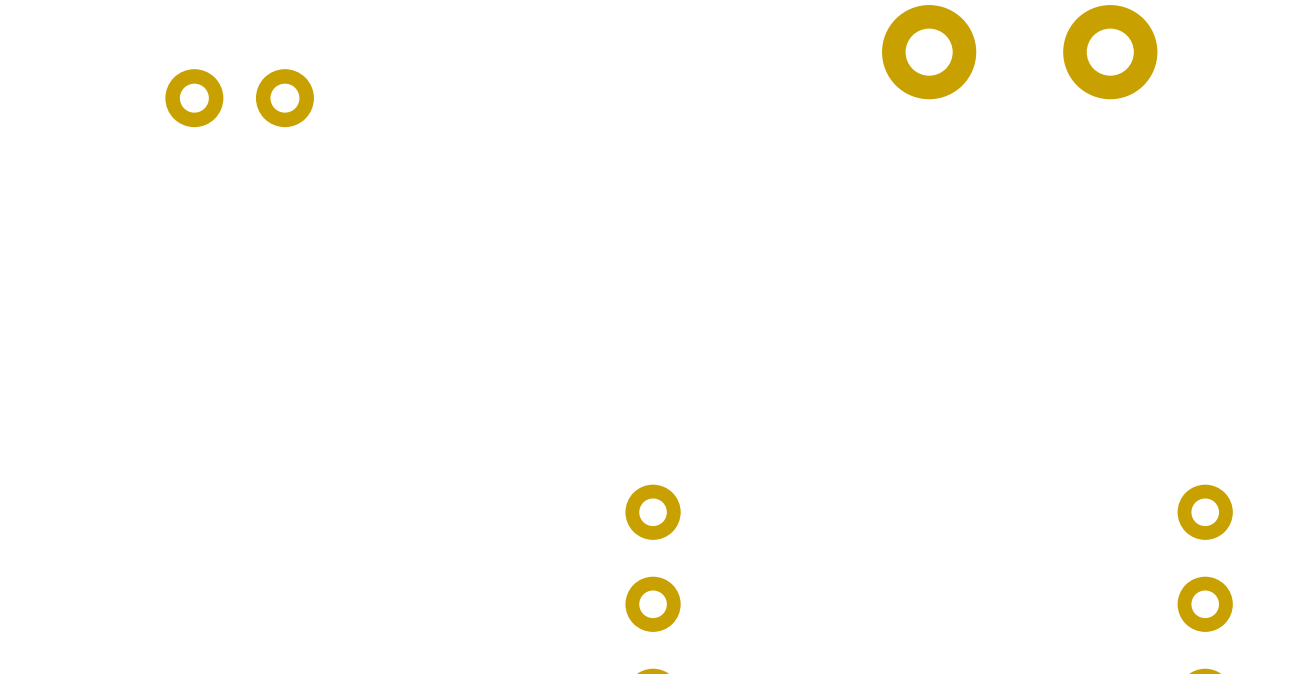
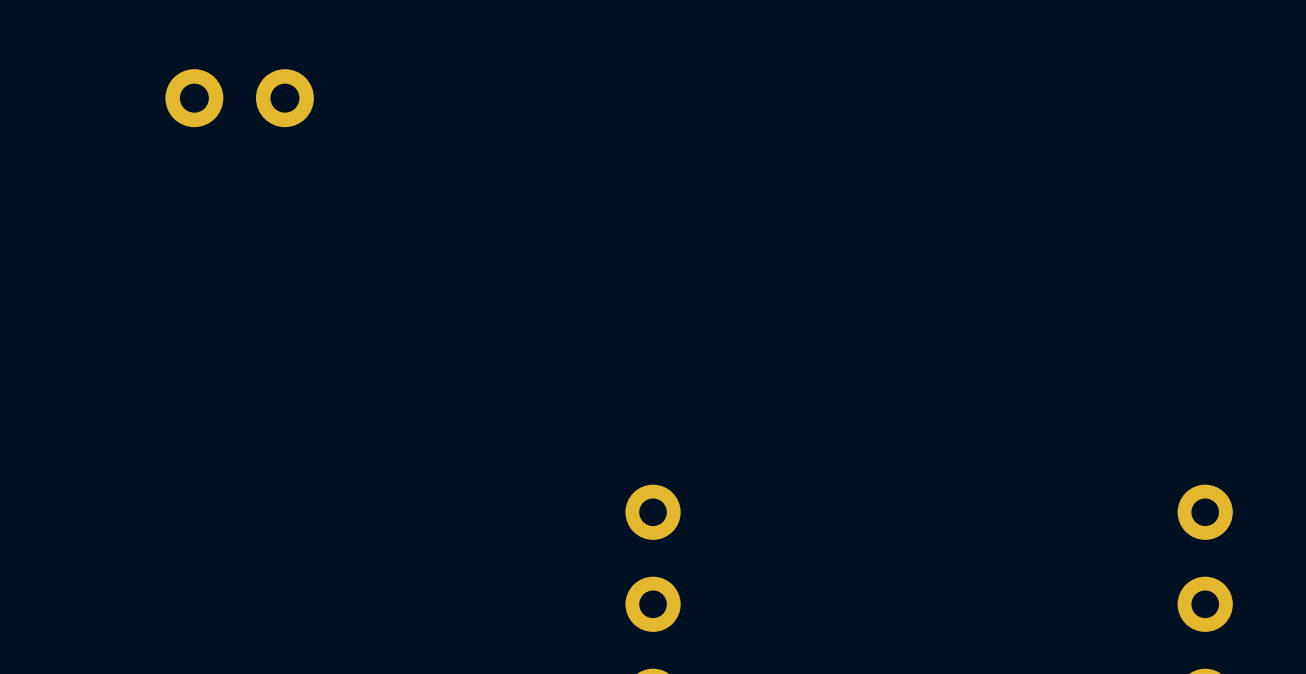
part: (1019, 52) -> none

